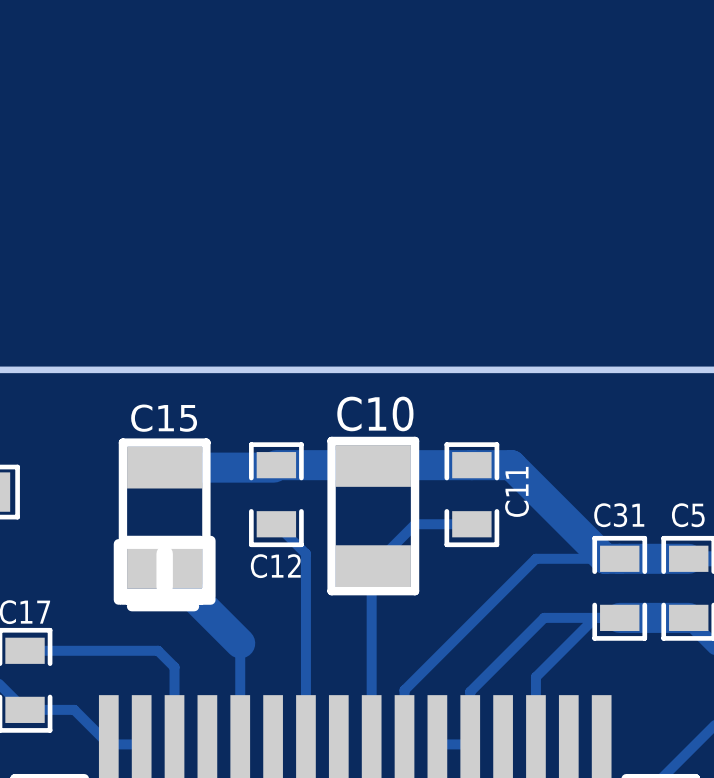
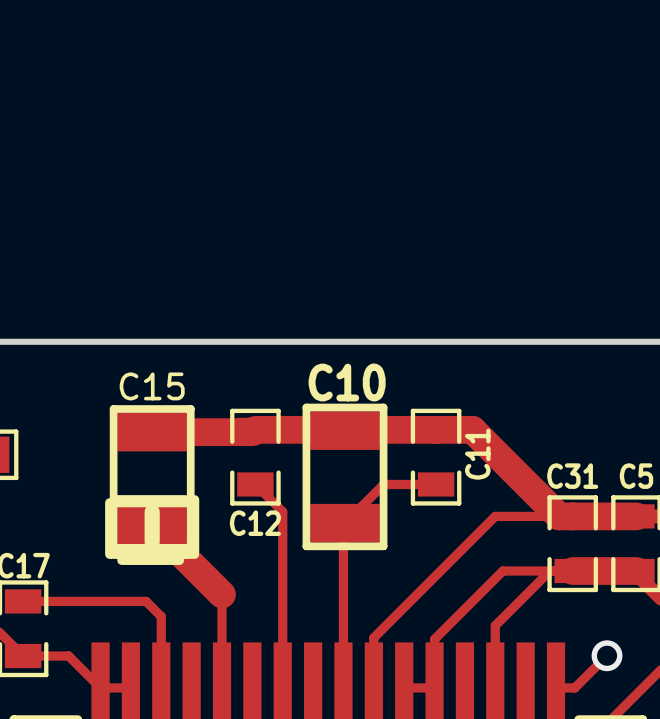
track: none -> (607, 655) (574, 687) (556, 687)
via: none -> (607, 655)

